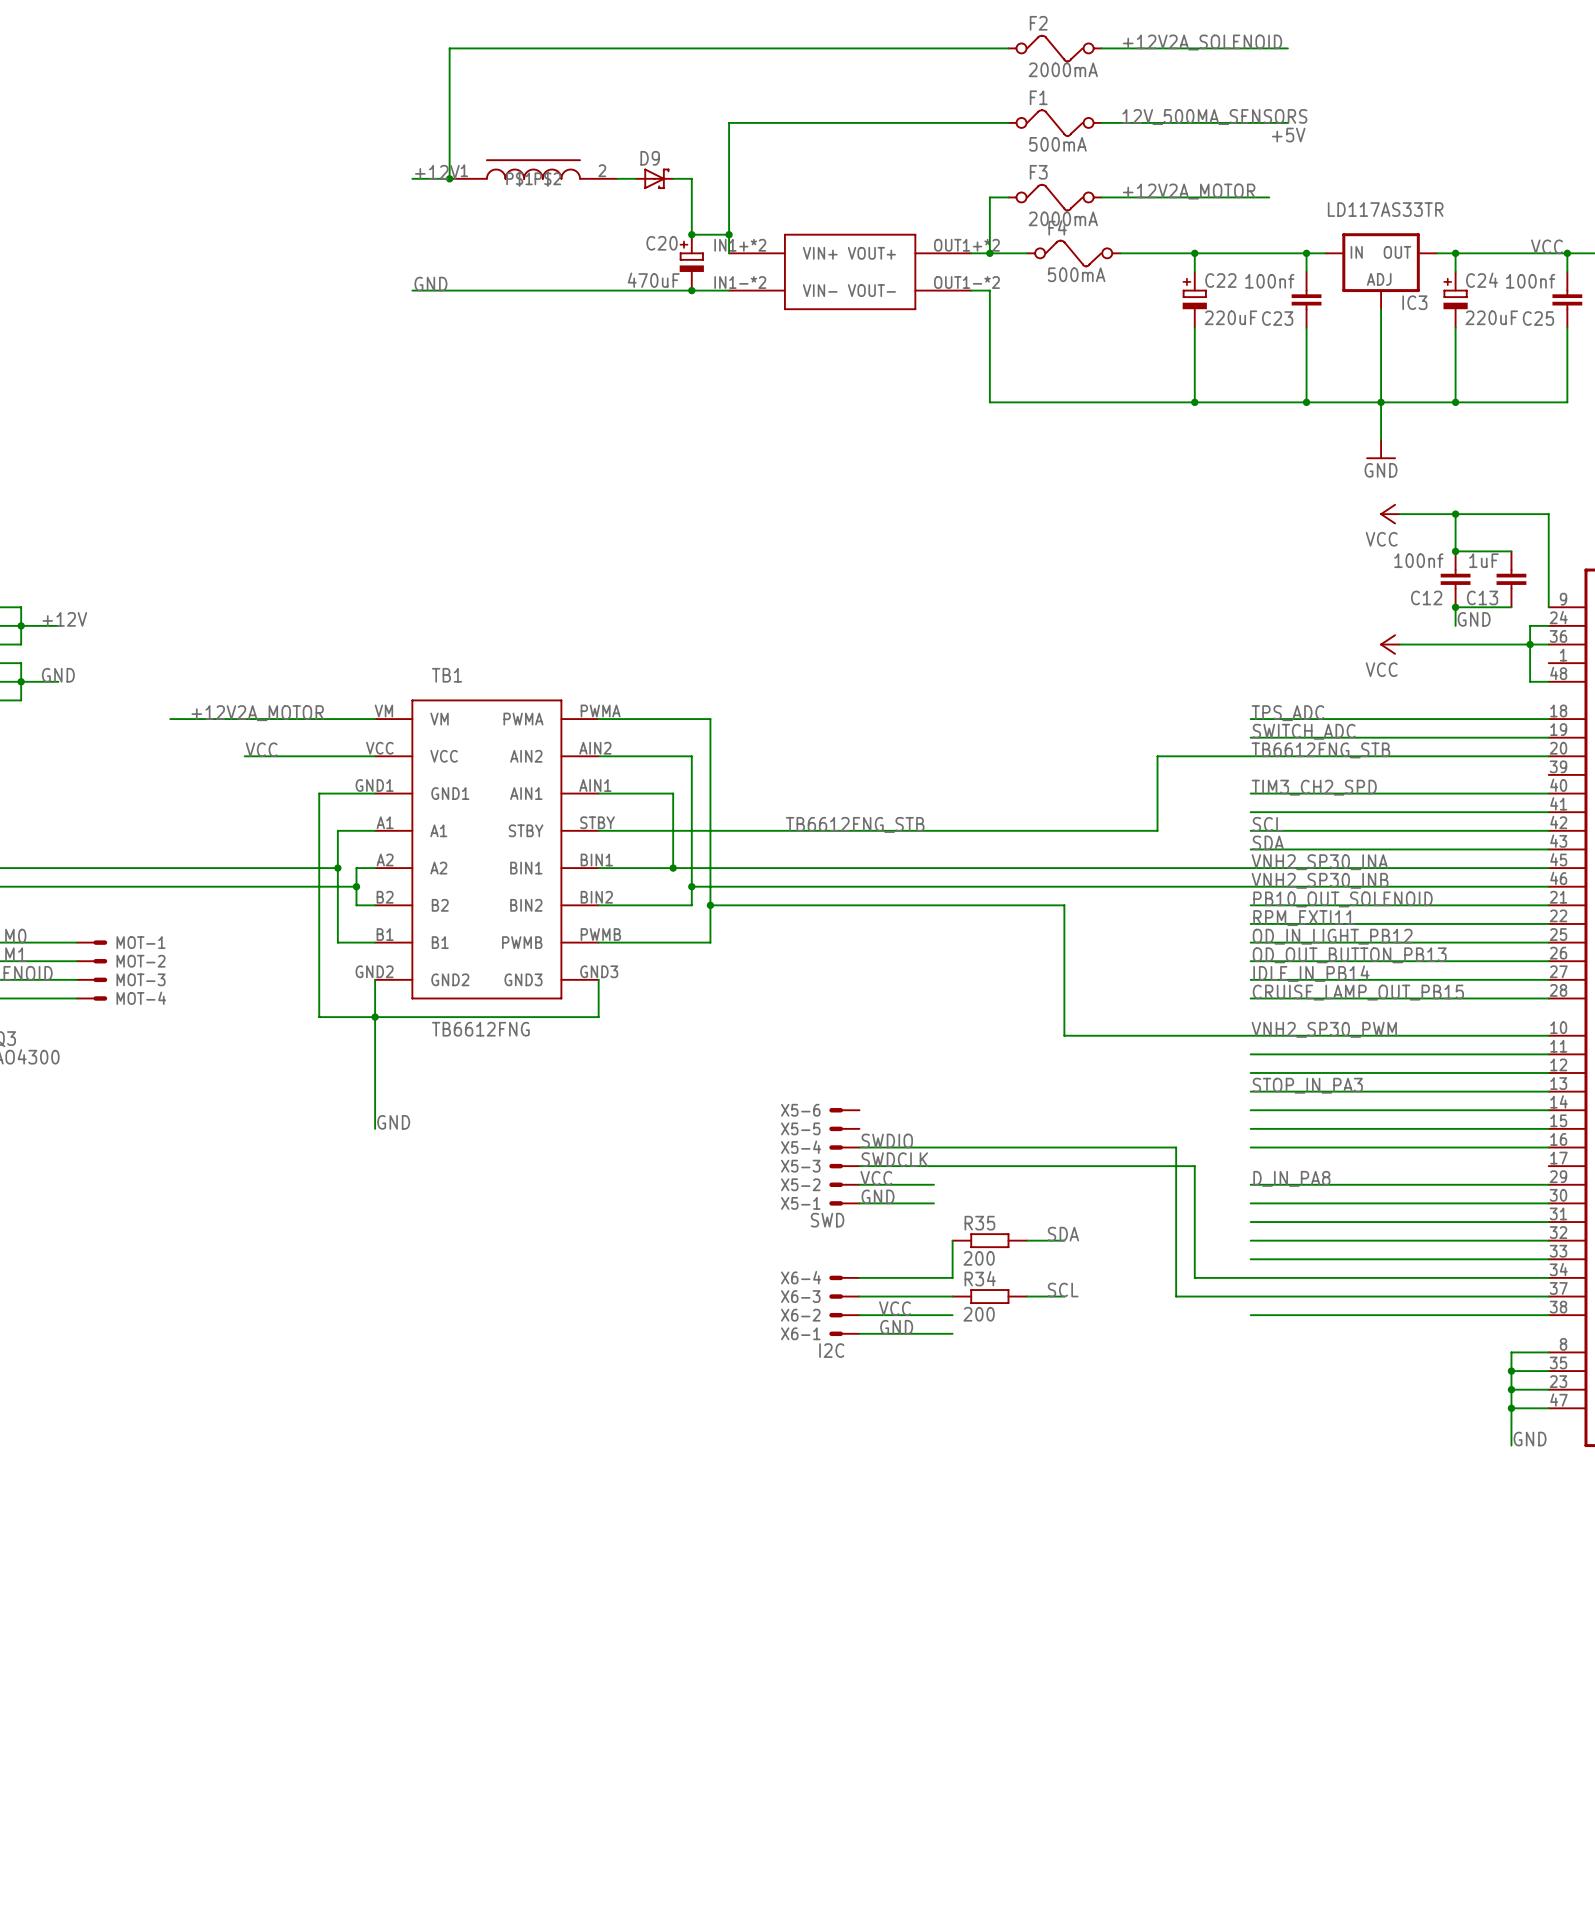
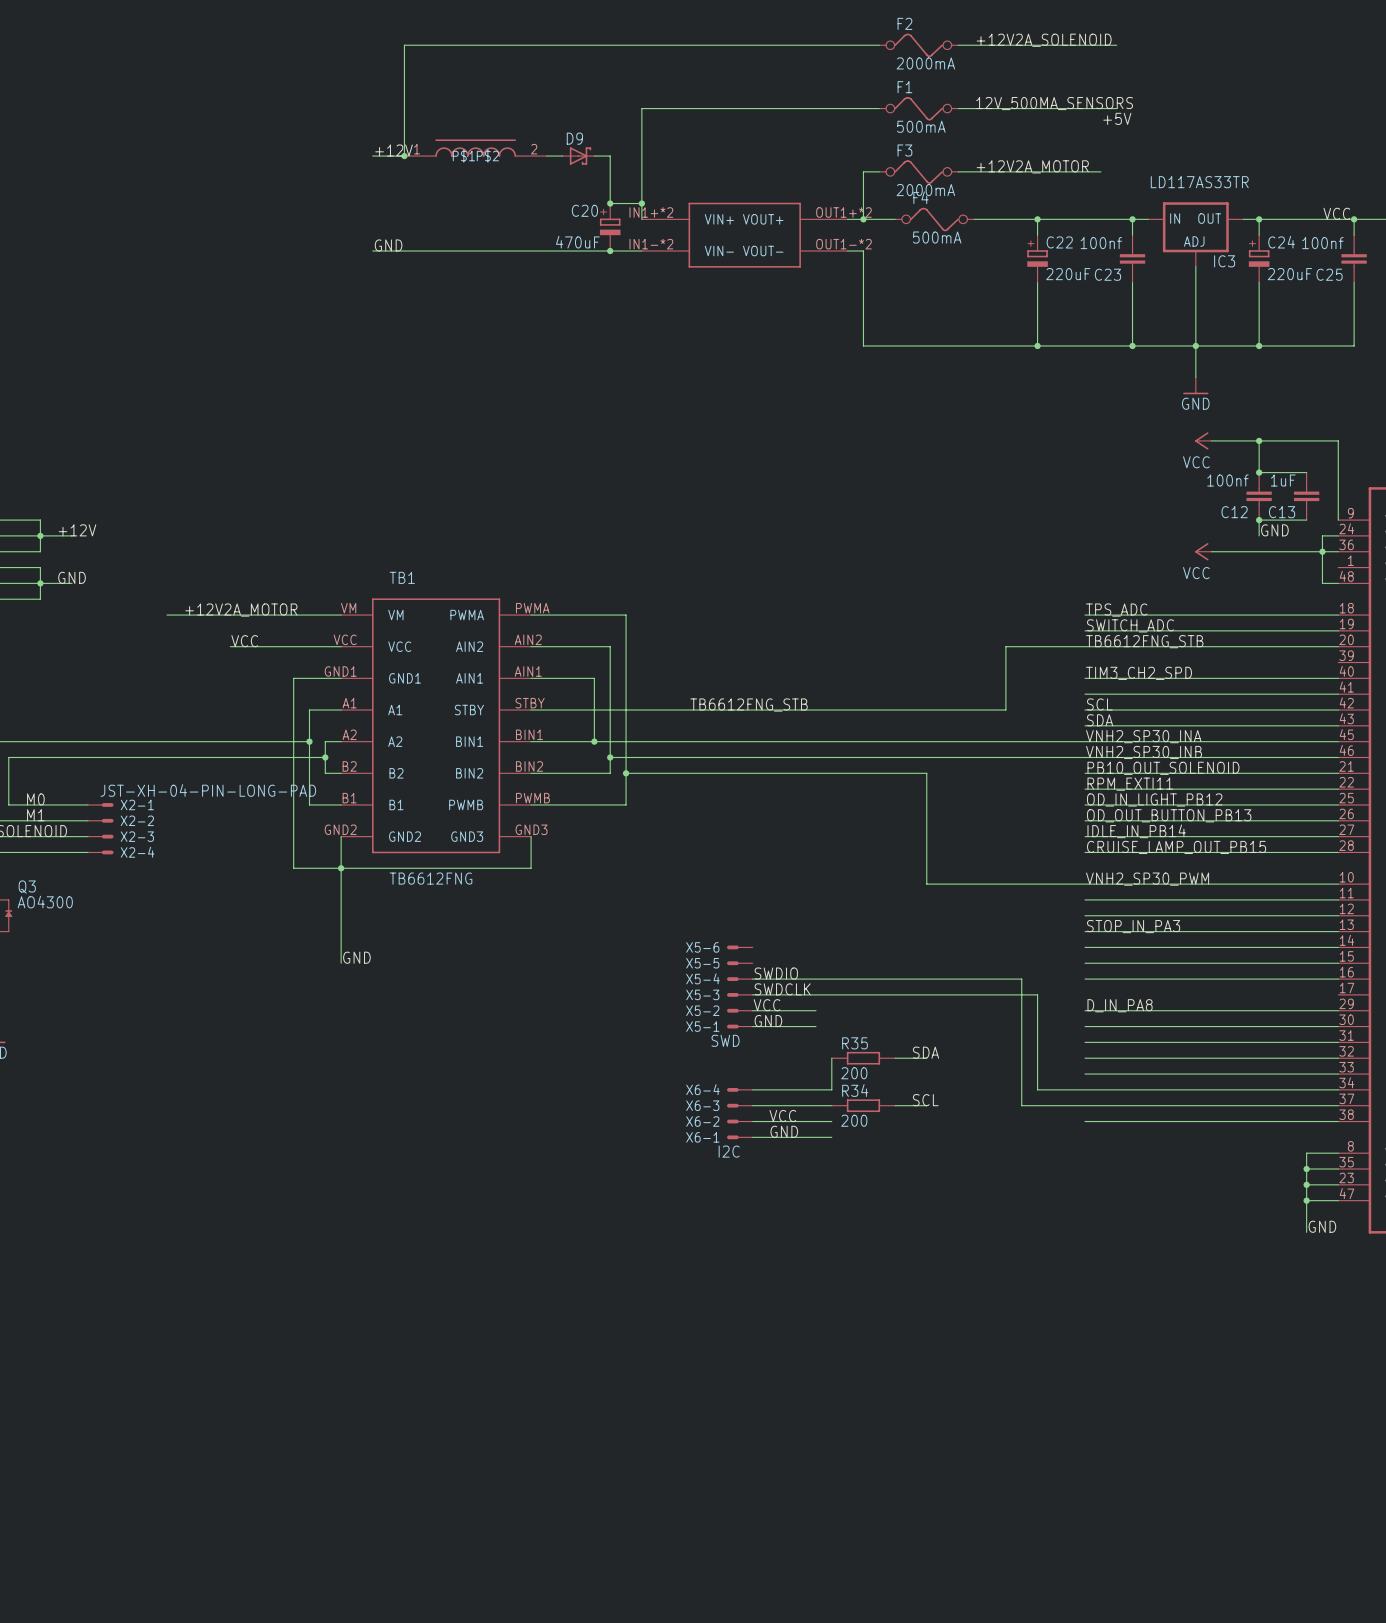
MOT-1 value: none -> JST-XH-04-PIN-LONG-PAD (208, 790)
MOT-1 name: MOT-1 (141, 942) -> X2-1 (137, 804)
MOT-2 name: MOT-2 (141, 961) -> X2-2 (137, 820)
MOT-3 name: MOT-3 (141, 979) -> X2-3 (137, 836)
MOT-4 name: MOT-4 (141, 998) -> X2-4 (137, 852)

